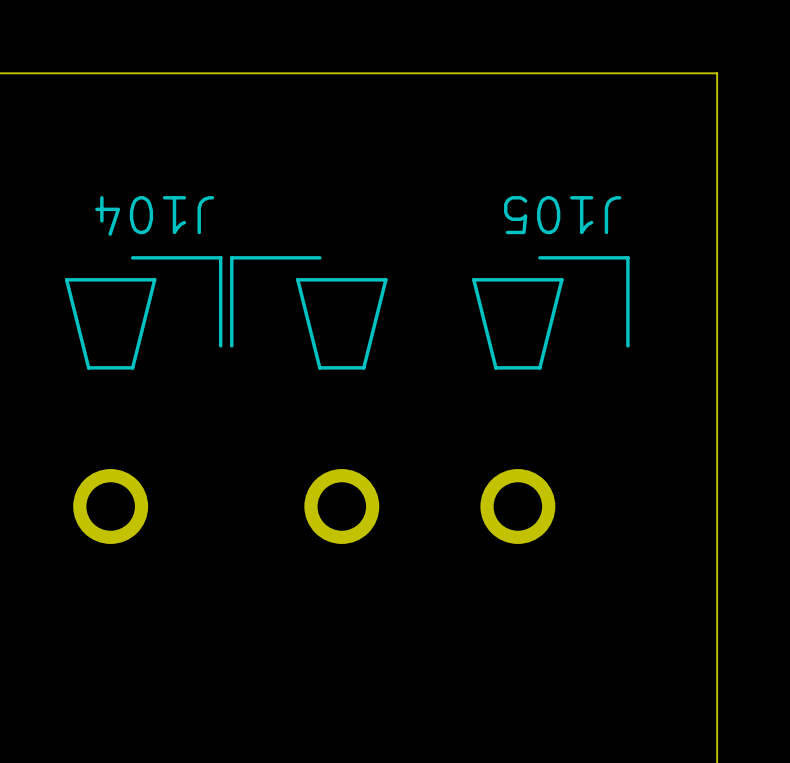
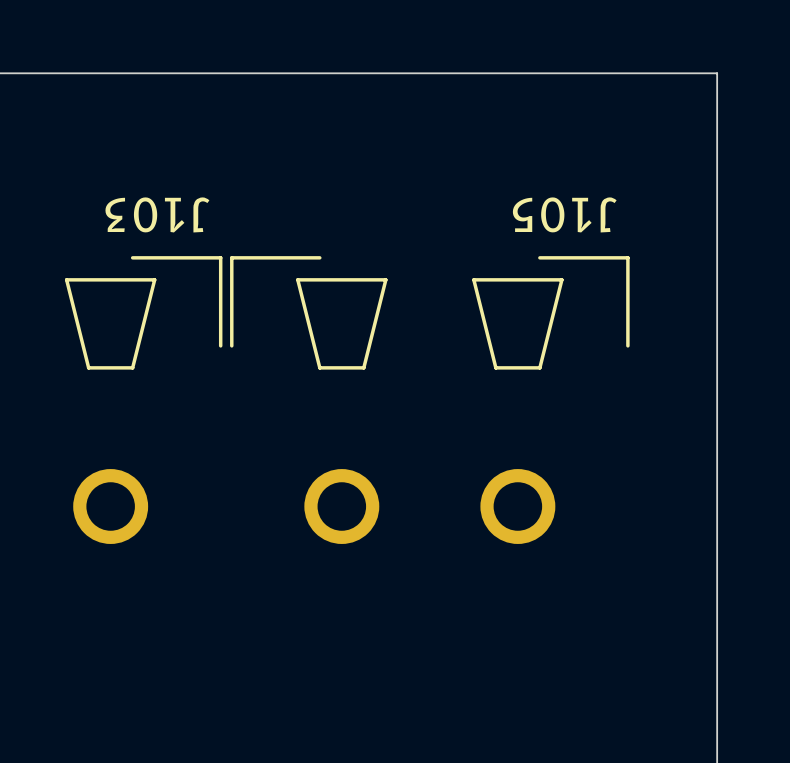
J104 name: J104 (154, 215) -> J103 (157, 214)

